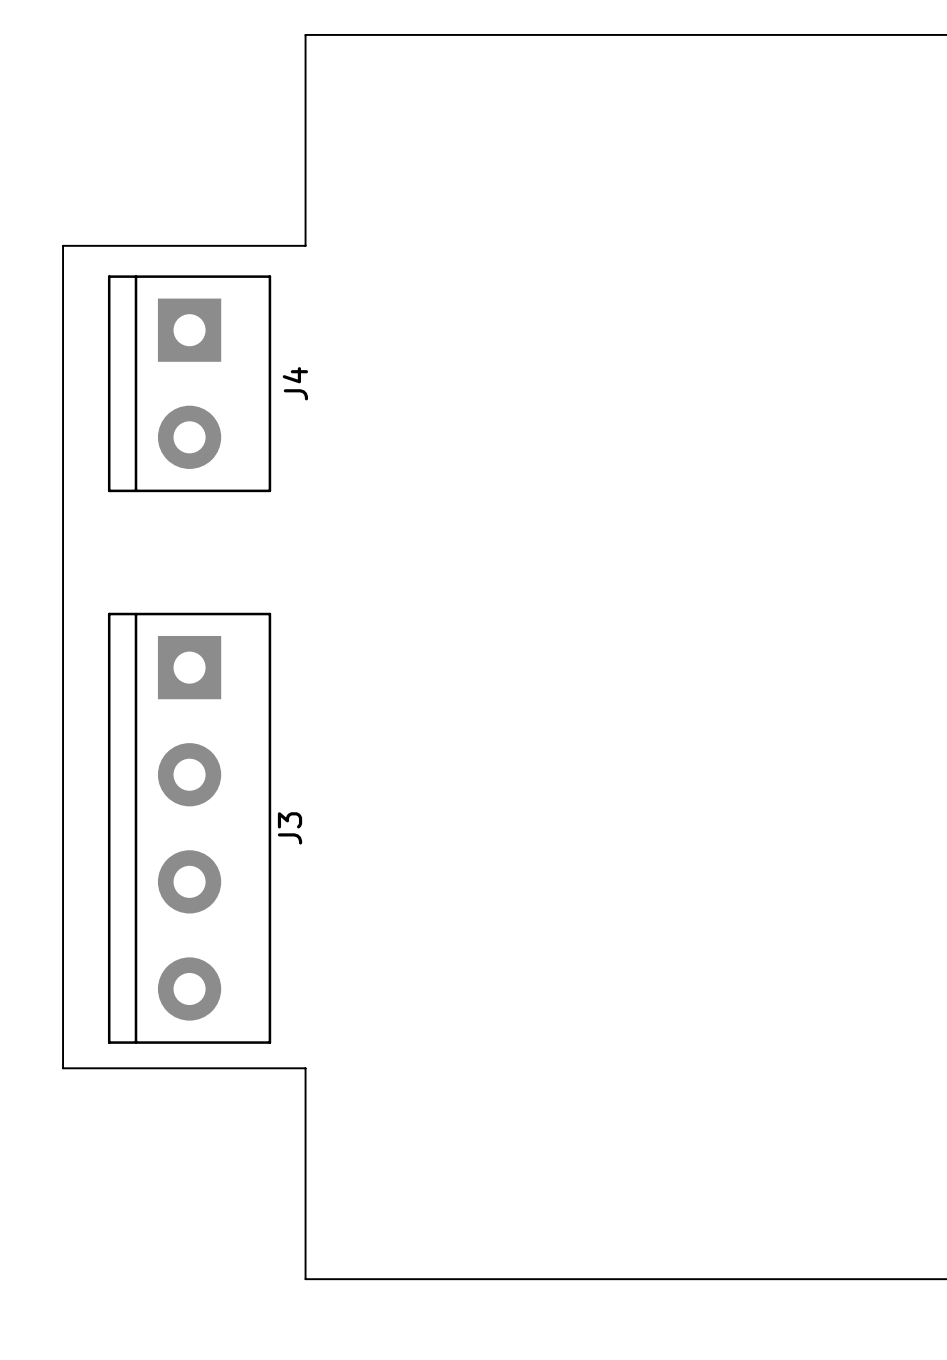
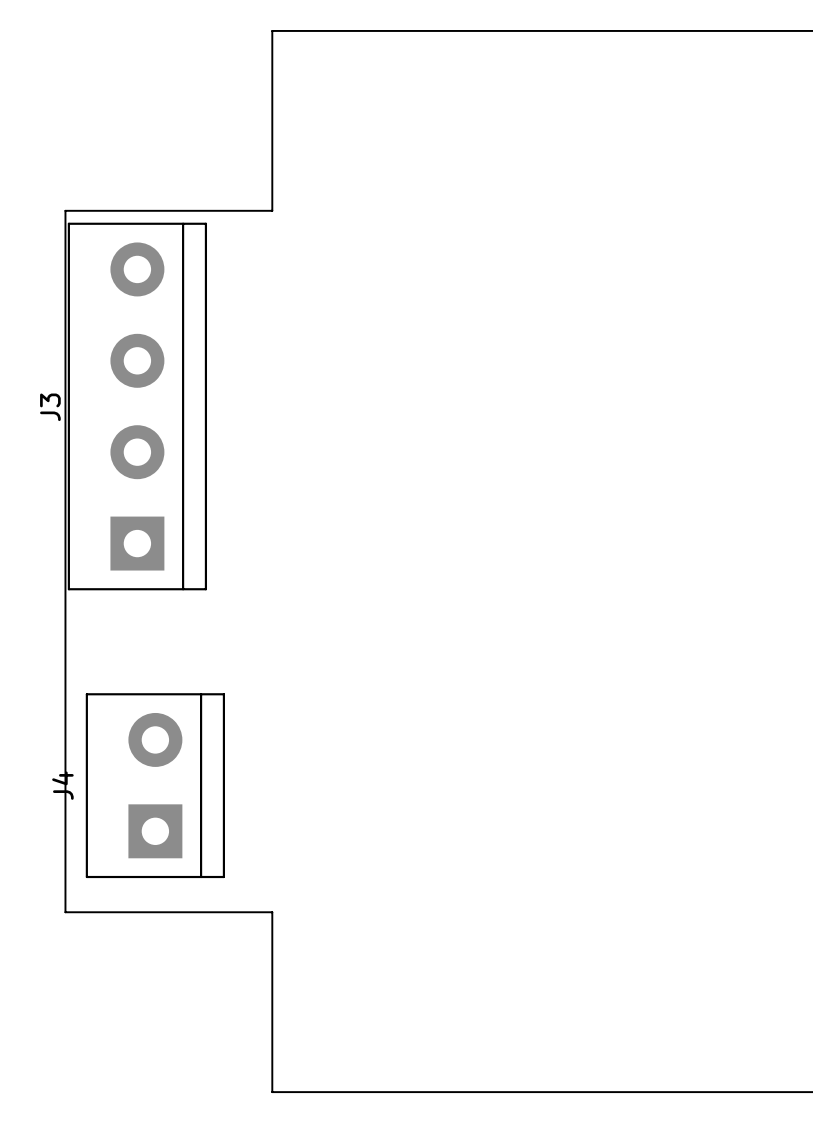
J4 rotation: 0° (189, 383) -> 180° (155, 785)
J4 position: (189, 383) -> (155, 785)
J3 rotation: 0° (189, 828) -> 180° (137, 406)
J3 position: (189, 828) -> (137, 406)

